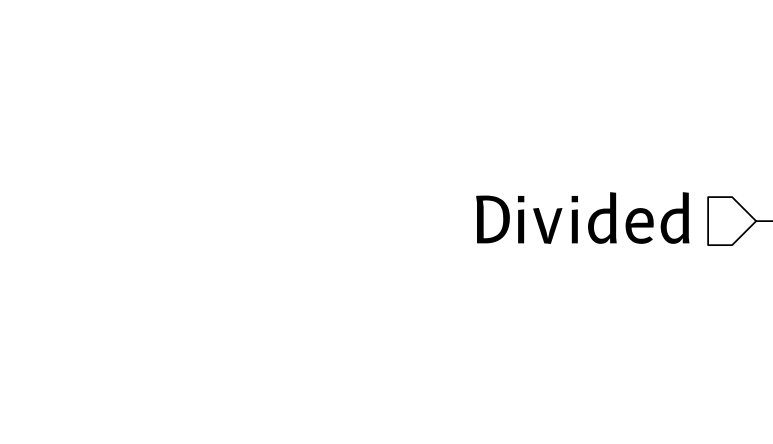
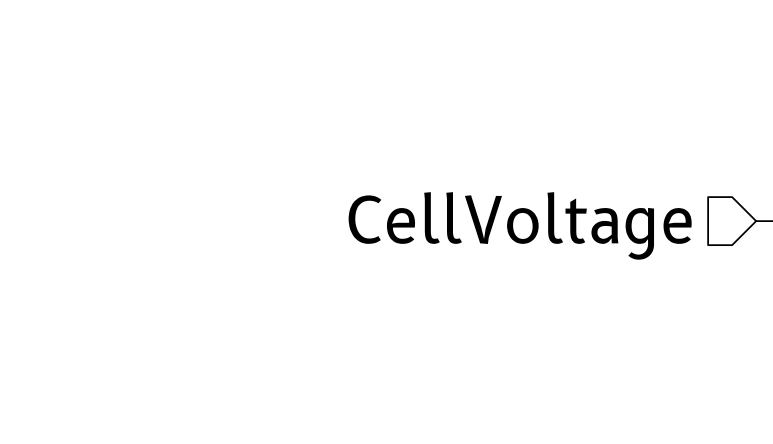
hierarchical label: Divided (582, 218) -> CellVoltage (520, 225)

